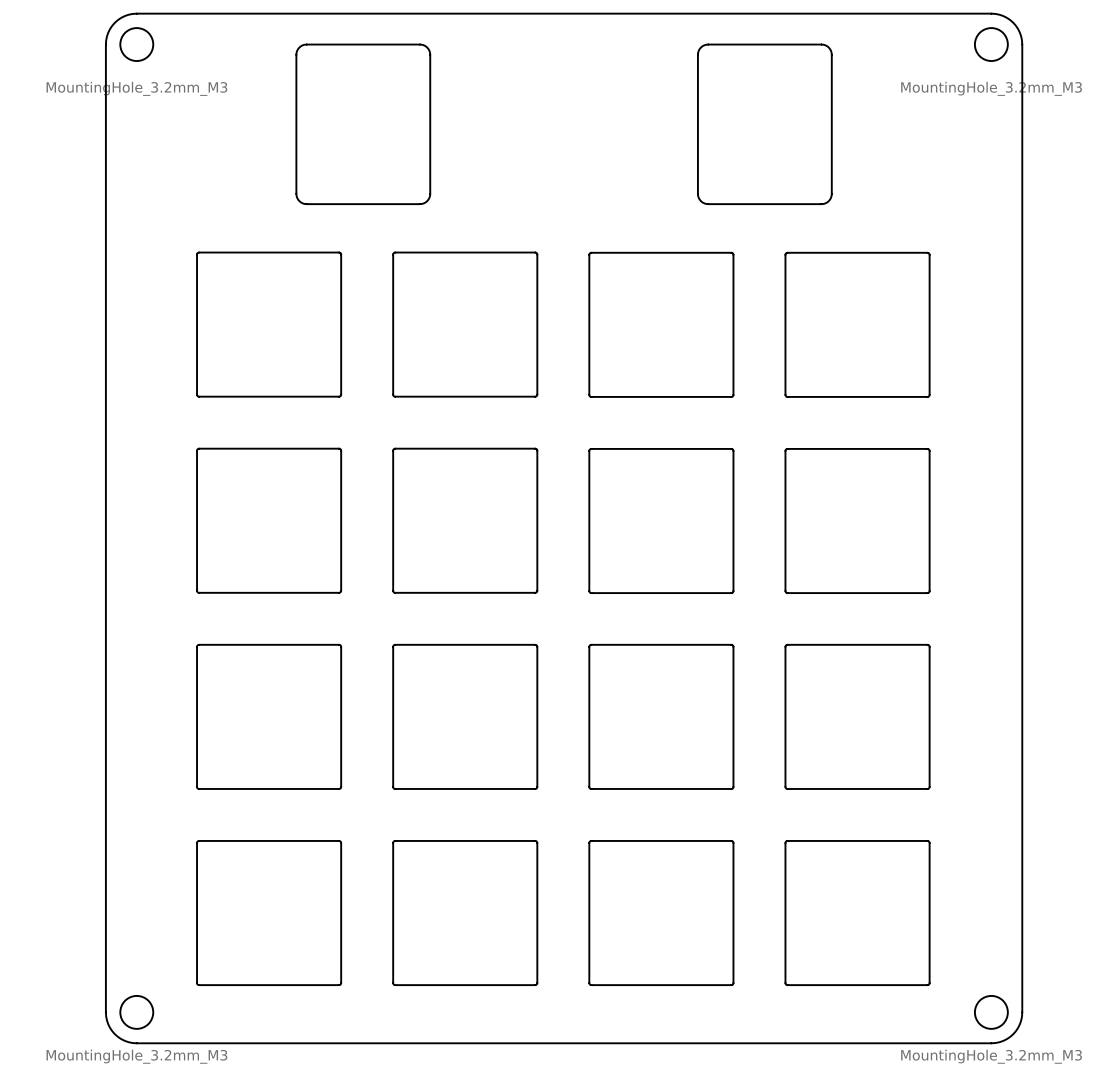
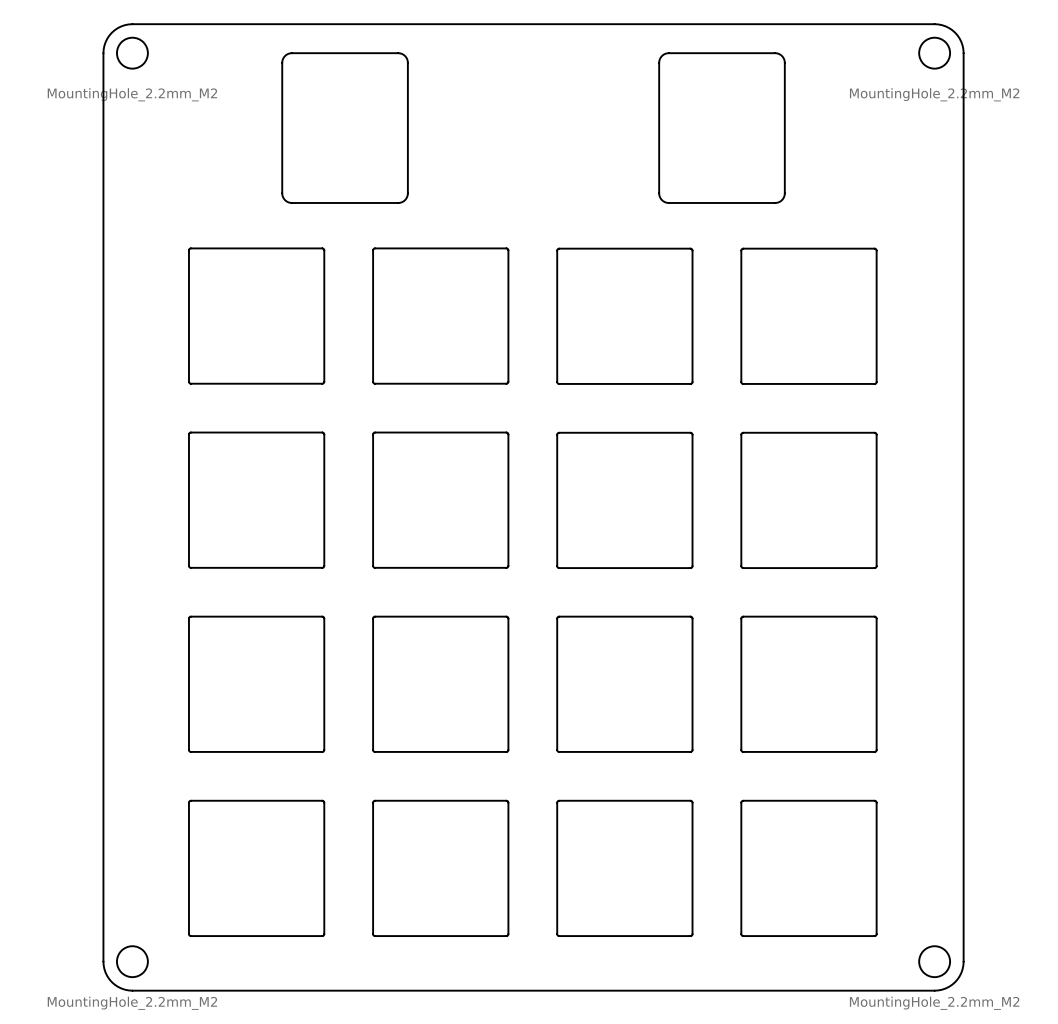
part value: MountingHole_3.2mm_M3 (136, 88) -> MountingHole_2.2mm_M2 (132, 94)
part value: MountingHole_3.2mm_M3 (991, 88) -> MountingHole_2.2mm_M2 (934, 94)
part value: MountingHole_3.2mm_M3 (136, 1056) -> MountingHole_2.2mm_M2 (132, 1003)
part value: MountingHole_3.2mm_M3 (991, 1056) -> MountingHole_2.2mm_M2 (934, 1003)

